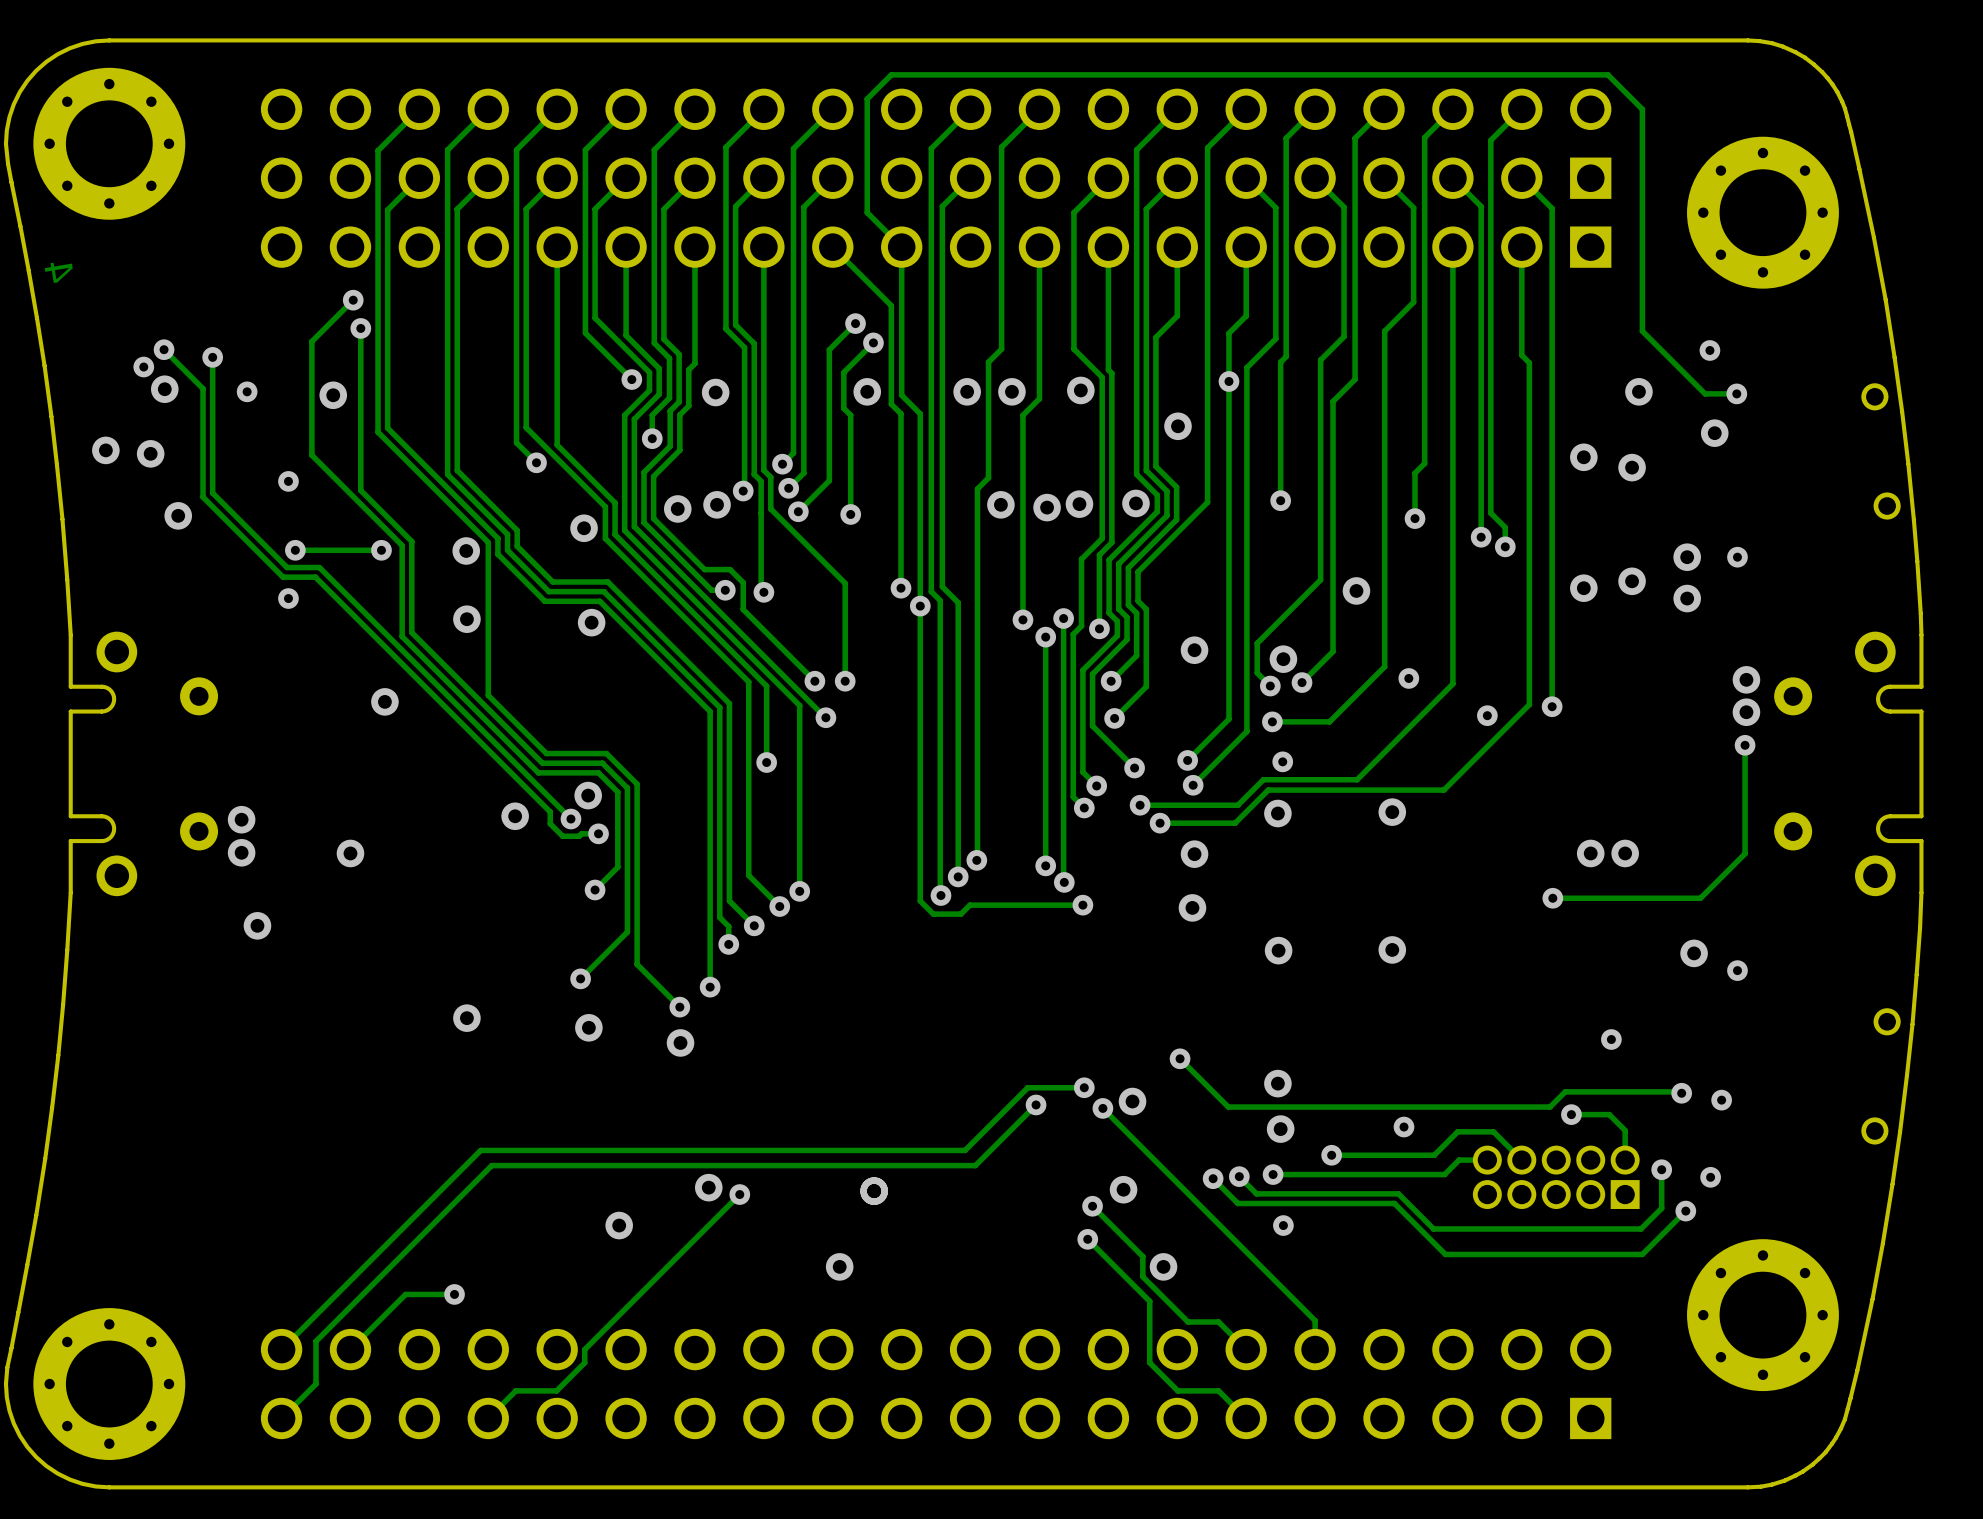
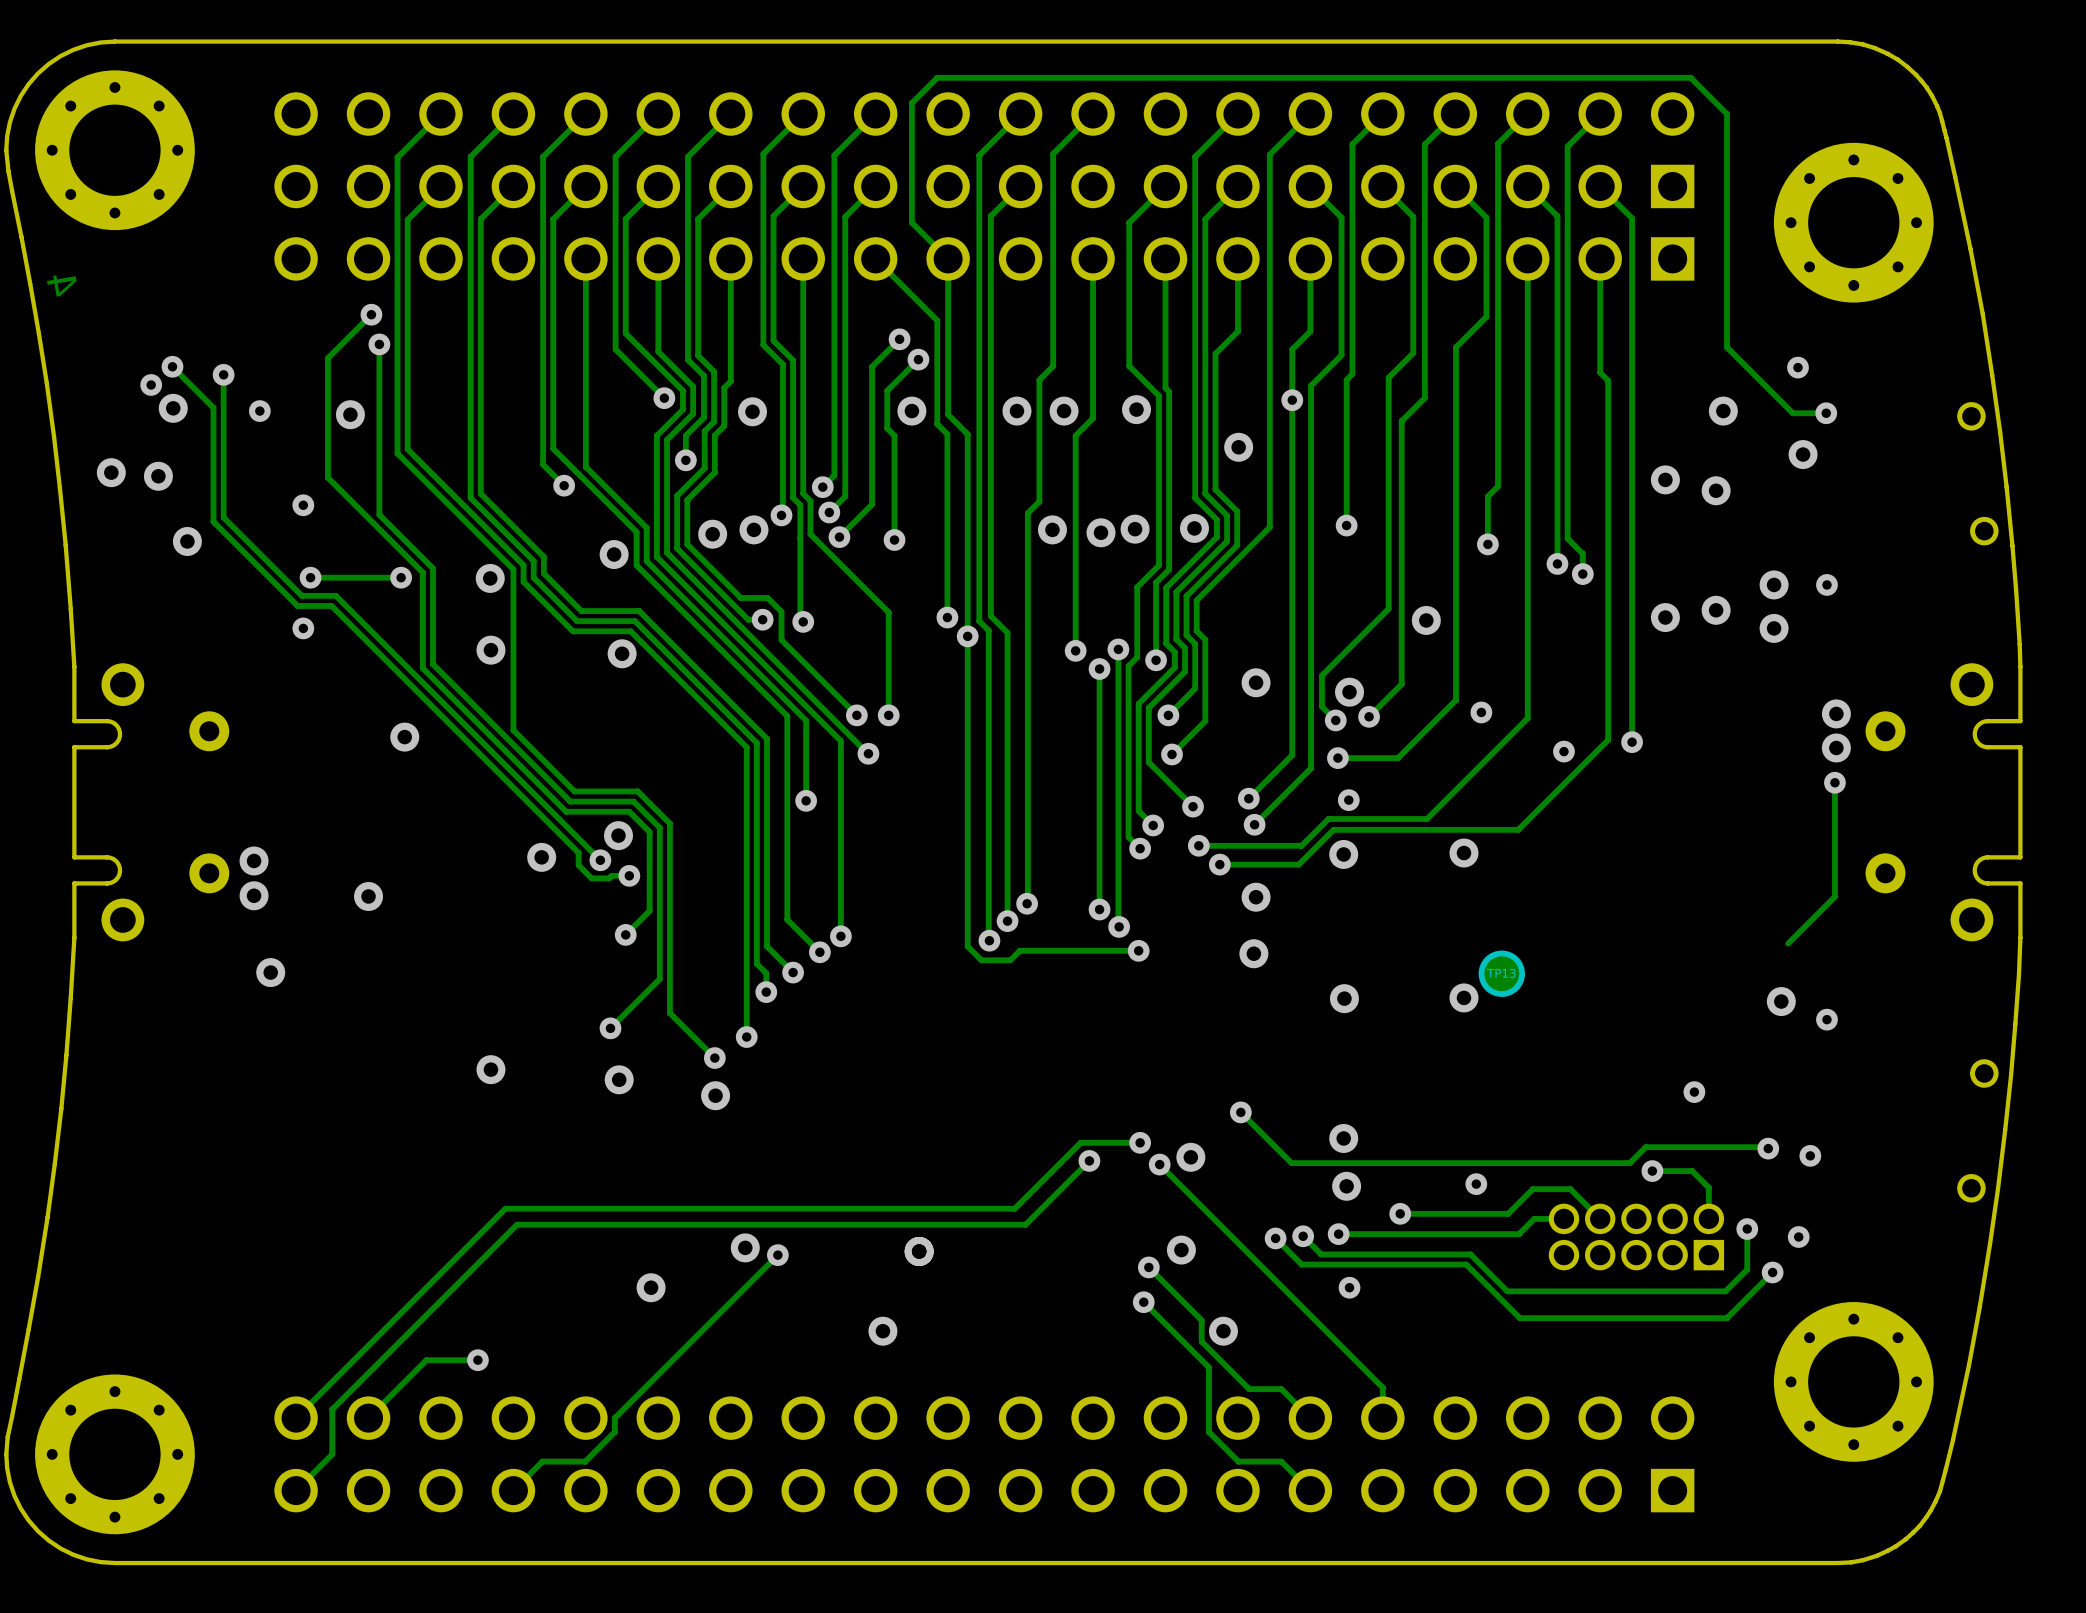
via: (1590, 853) -> none
via: (1625, 853) -> none
via: (1552, 898) -> none
track: (1700, 898) (1552, 898) -> none
TP13: none -> (1501, 973)

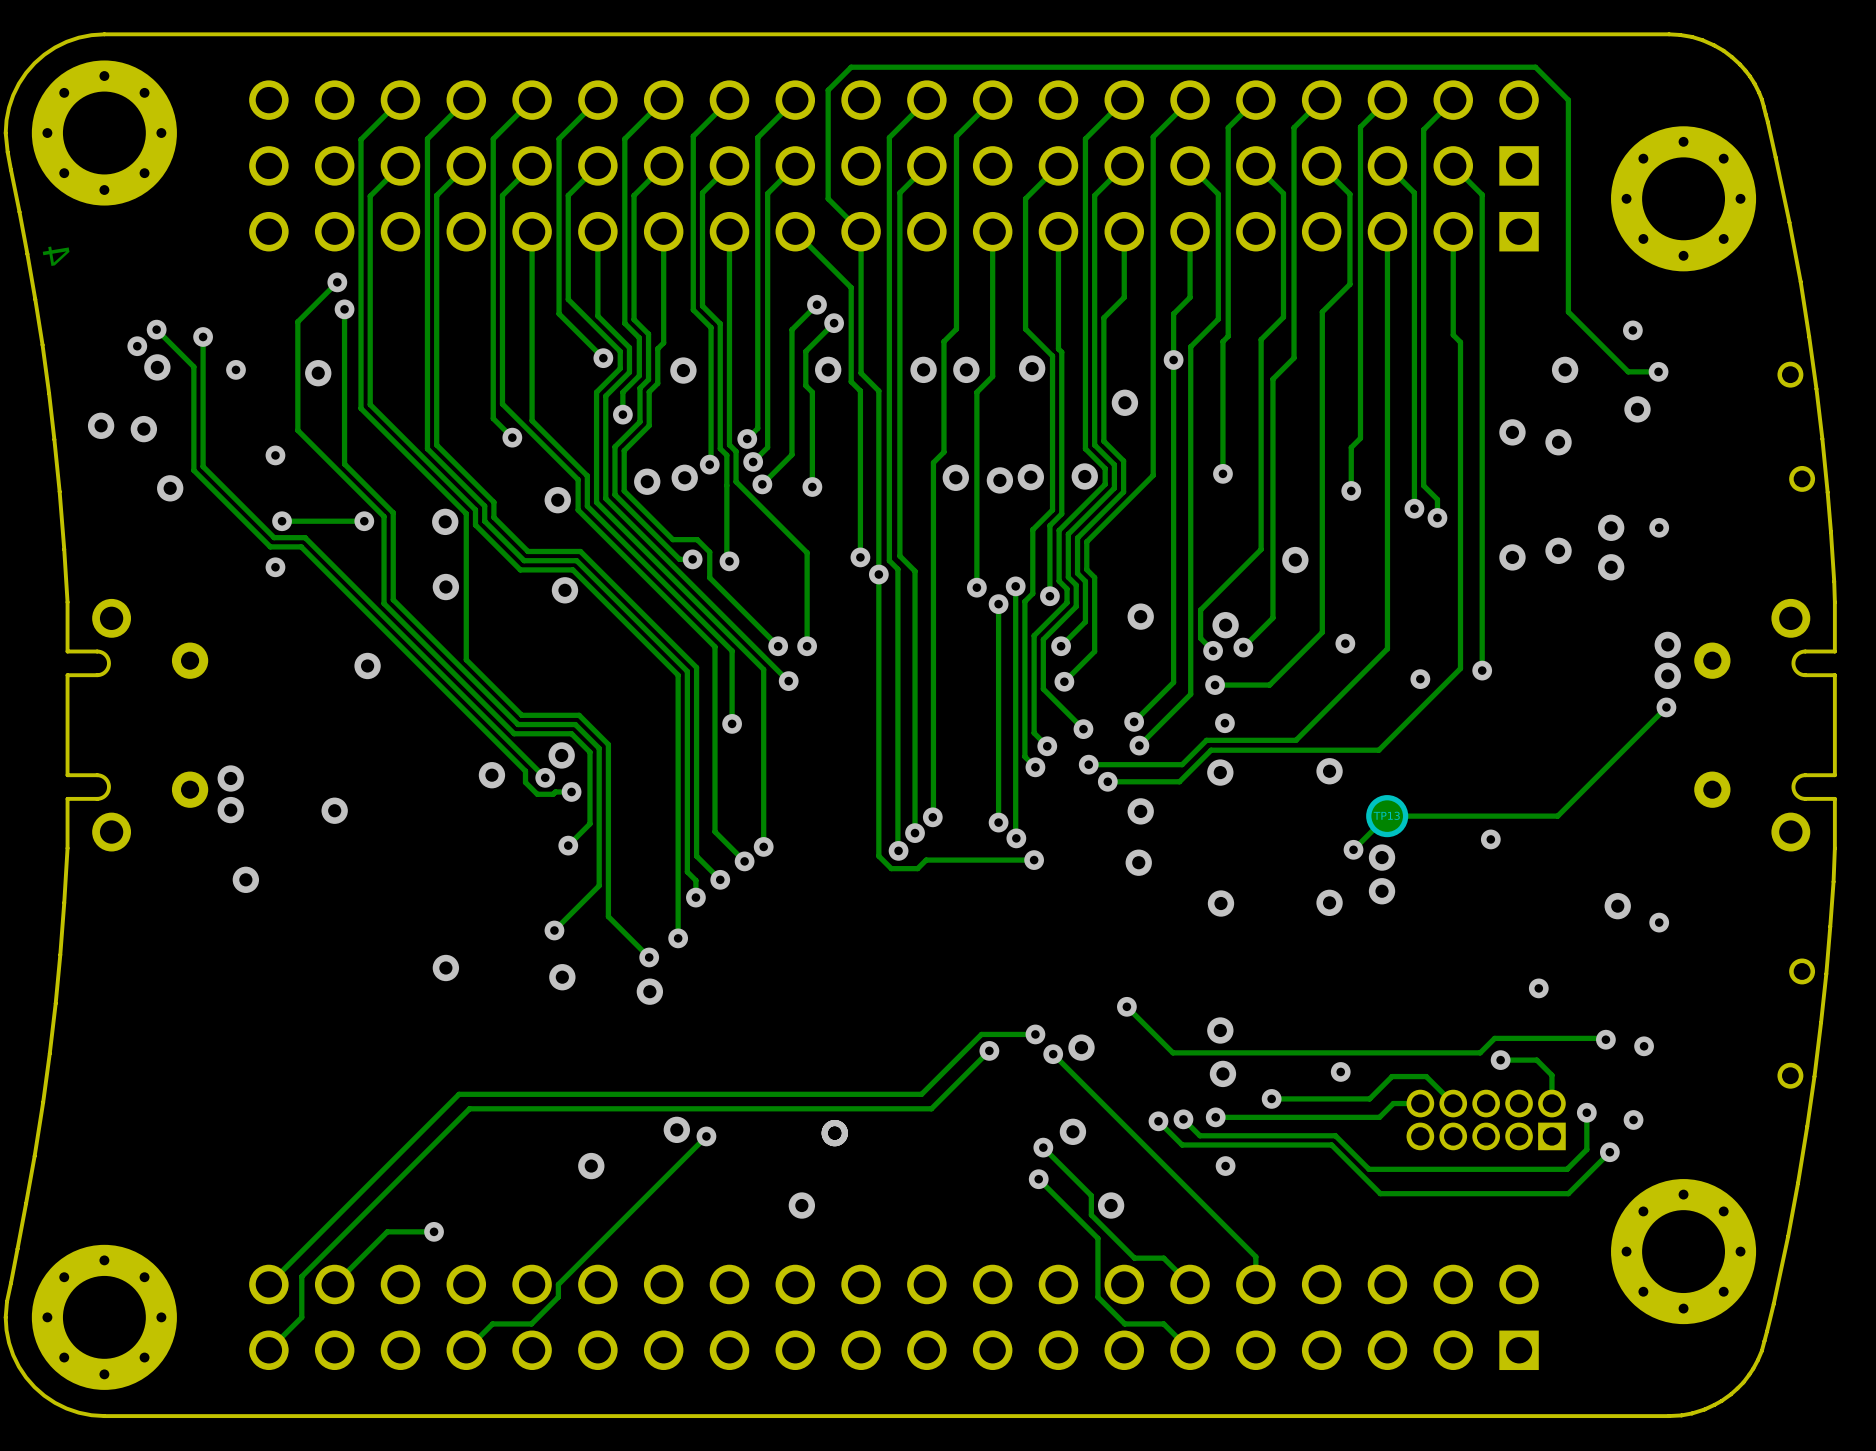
track: (1834, 782) (1834, 896) (1788, 943) -> (1666, 707) (1557, 816) (1387, 816) (1353, 849)
via: none -> (1490, 839)
via: none -> (1353, 849)
via: none -> (1382, 857)
TP13 position: (1501, 973) -> (1387, 816)
via: none -> (1382, 891)

